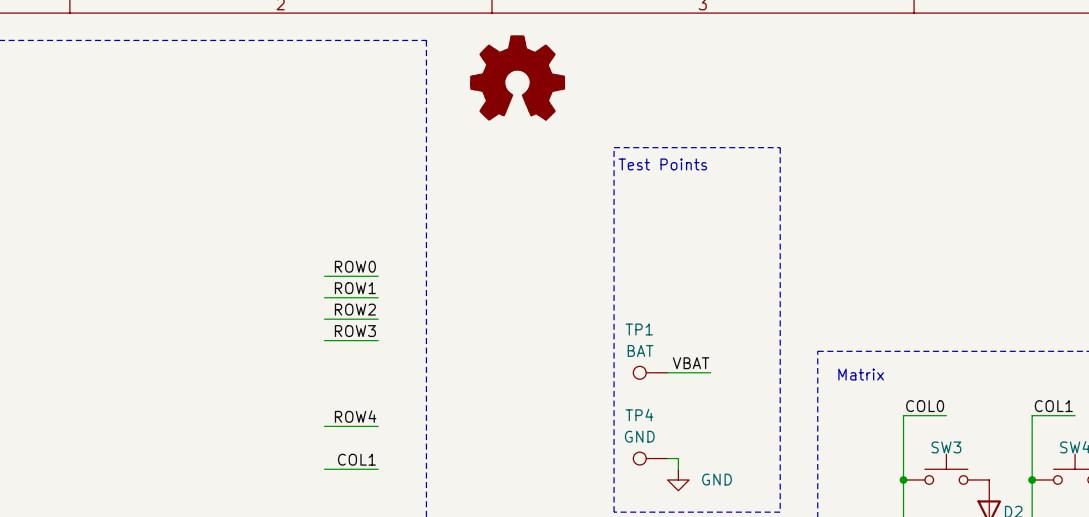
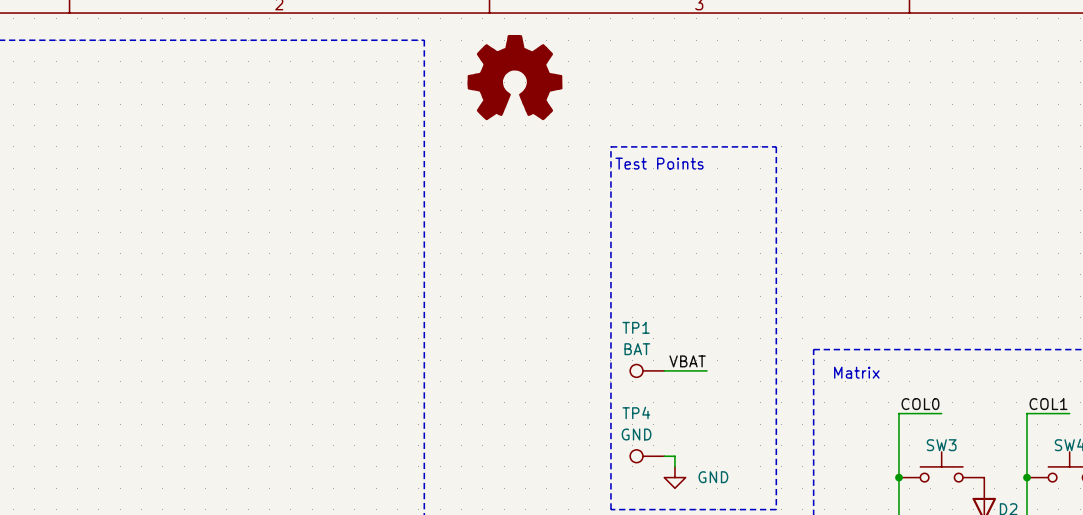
label: ROW0 (355, 266) -> none
wire: (324, 276) (378, 276) -> none
label: ROW1 (355, 288) -> none
wire: (324, 297) (378, 297) -> none
label: ROW2 (355, 309) -> none
wire: (324, 319) (378, 319) -> none
label: ROW3 (355, 331) -> none
wire: (324, 340) (378, 340) -> none
label: ROW4 (355, 416) -> none
wire: (324, 426) (378, 426) -> none
label: COL1 (356, 459) -> none
wire: (324, 469) (378, 469) -> none

